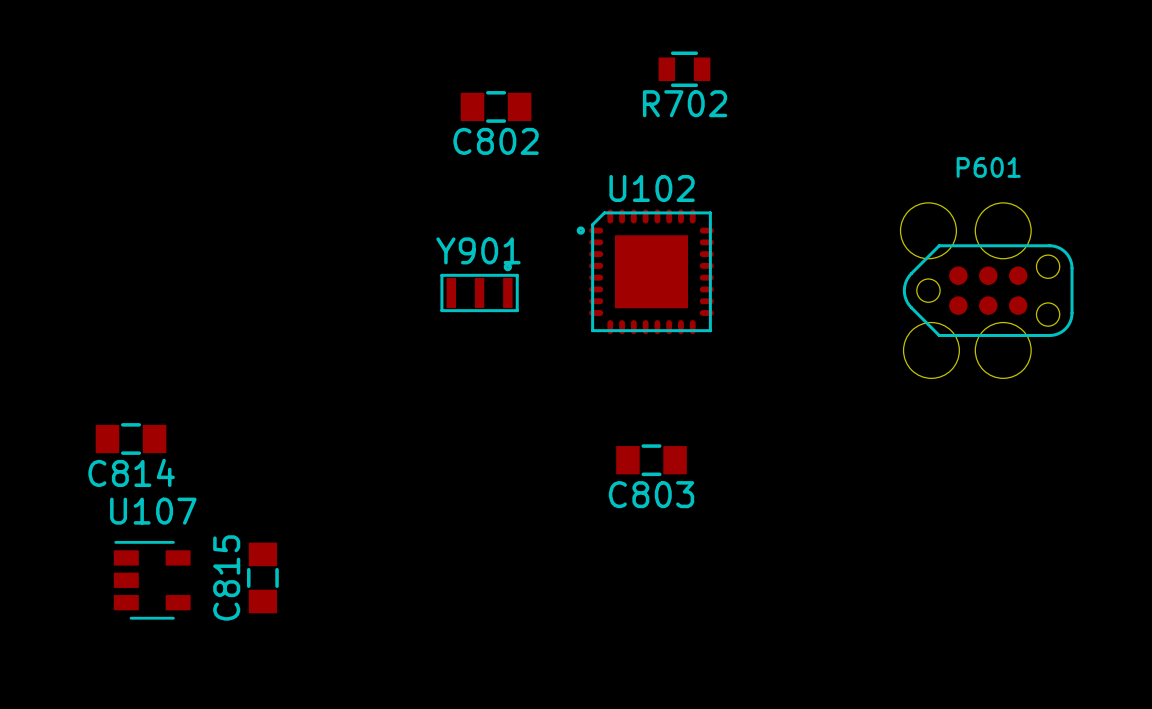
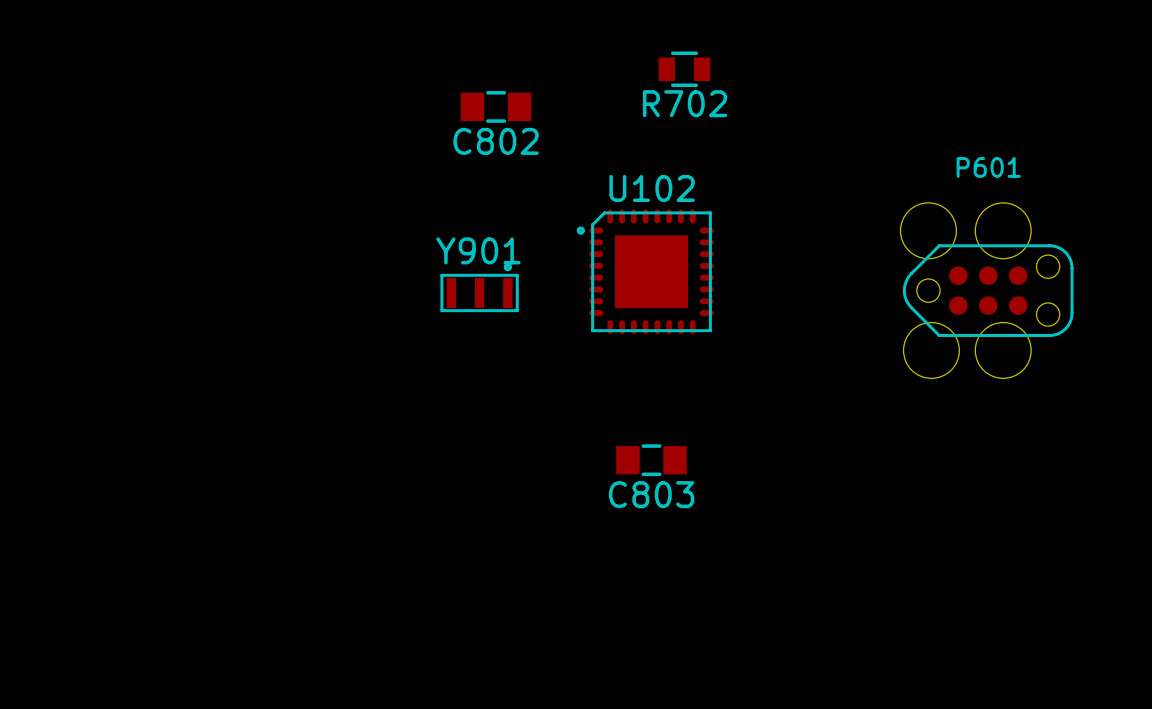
C814: (131, 439) -> none
C815: (262, 577) -> none
U107: (152, 580) -> none

